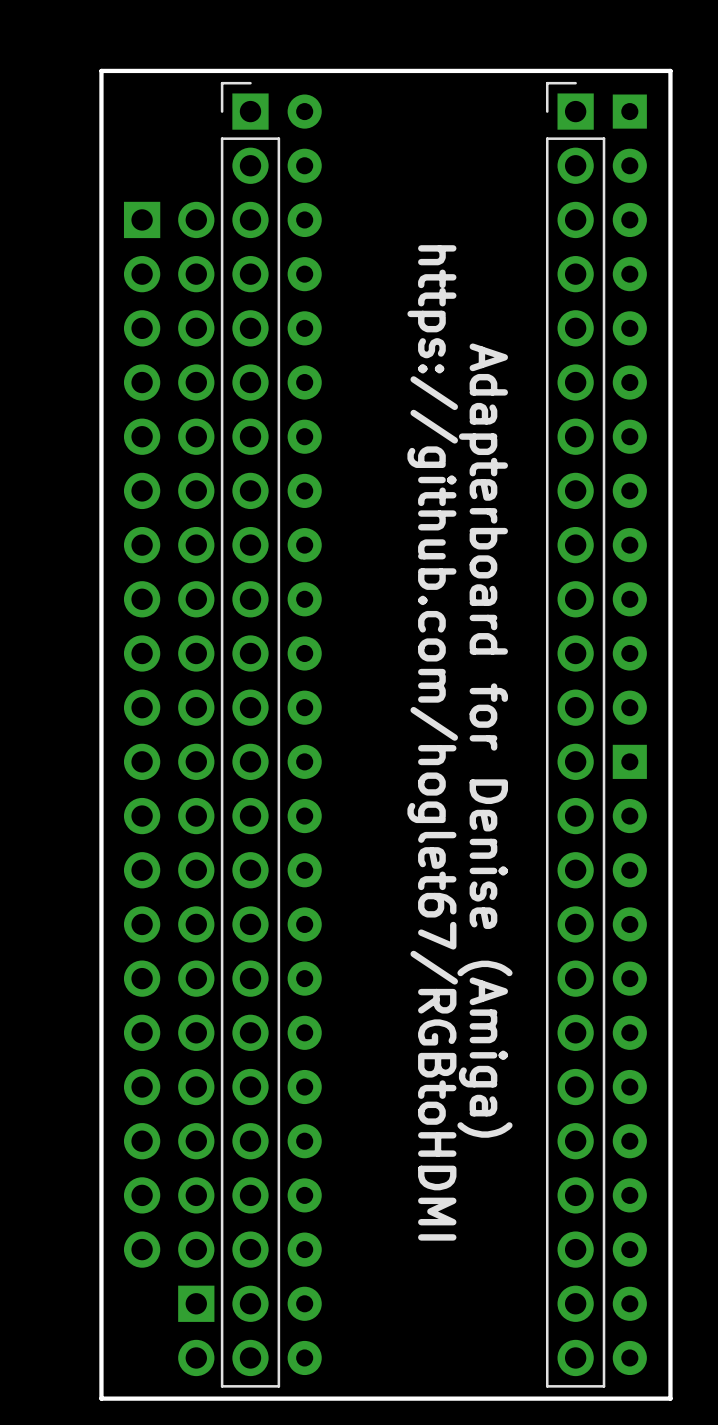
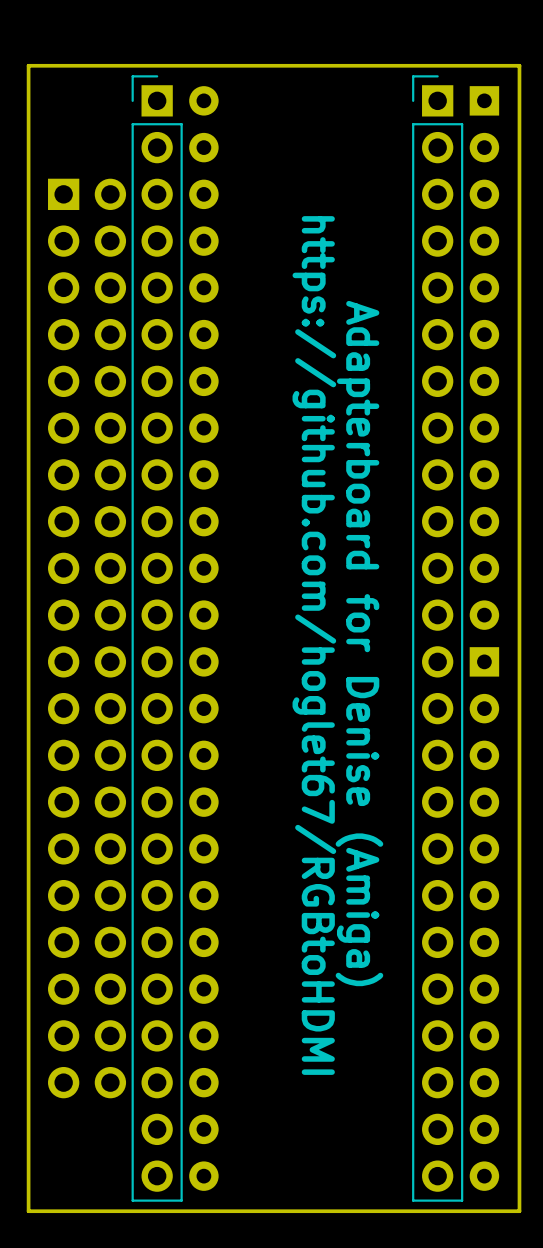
part: (196, 1330) -> none

